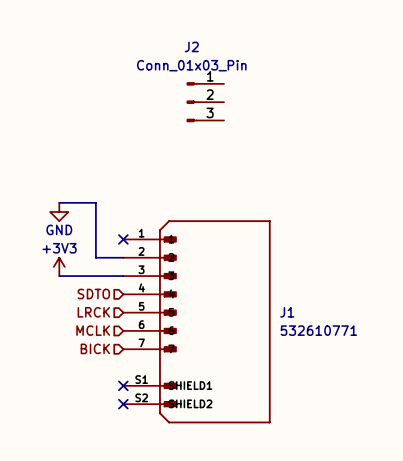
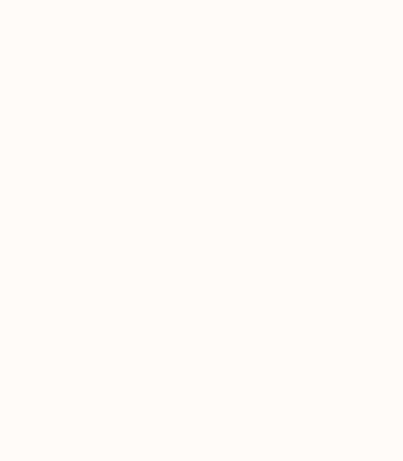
J2: Conn_01x03_Pin (205, 102) -> none
wire: (59, 202) (95, 202) (95, 257) (123, 257) -> none
power symbol: GND (59, 211) -> none
no-connect mark: (123, 239) -> none
power symbol: +3V3 (59, 266) -> none
wire: (59, 276) (123, 276) -> none
hierarchical label: SDTO (93, 294) -> none
hierarchical label: LRCK (93, 312) -> none
J1: 532610771 (197, 321) -> none
hierarchical label: MCLK (93, 330) -> none
hierarchical label: BICK (95, 348) -> none
no-connect mark: (123, 385) -> none
no-connect mark: (123, 404) -> none

